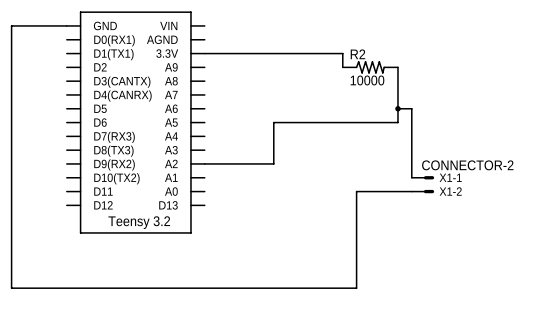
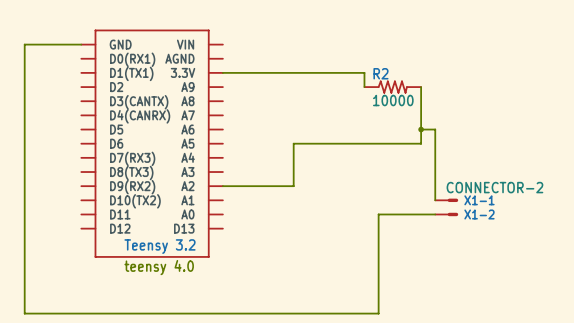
text: none -> teensy 4.0 (159, 267)

